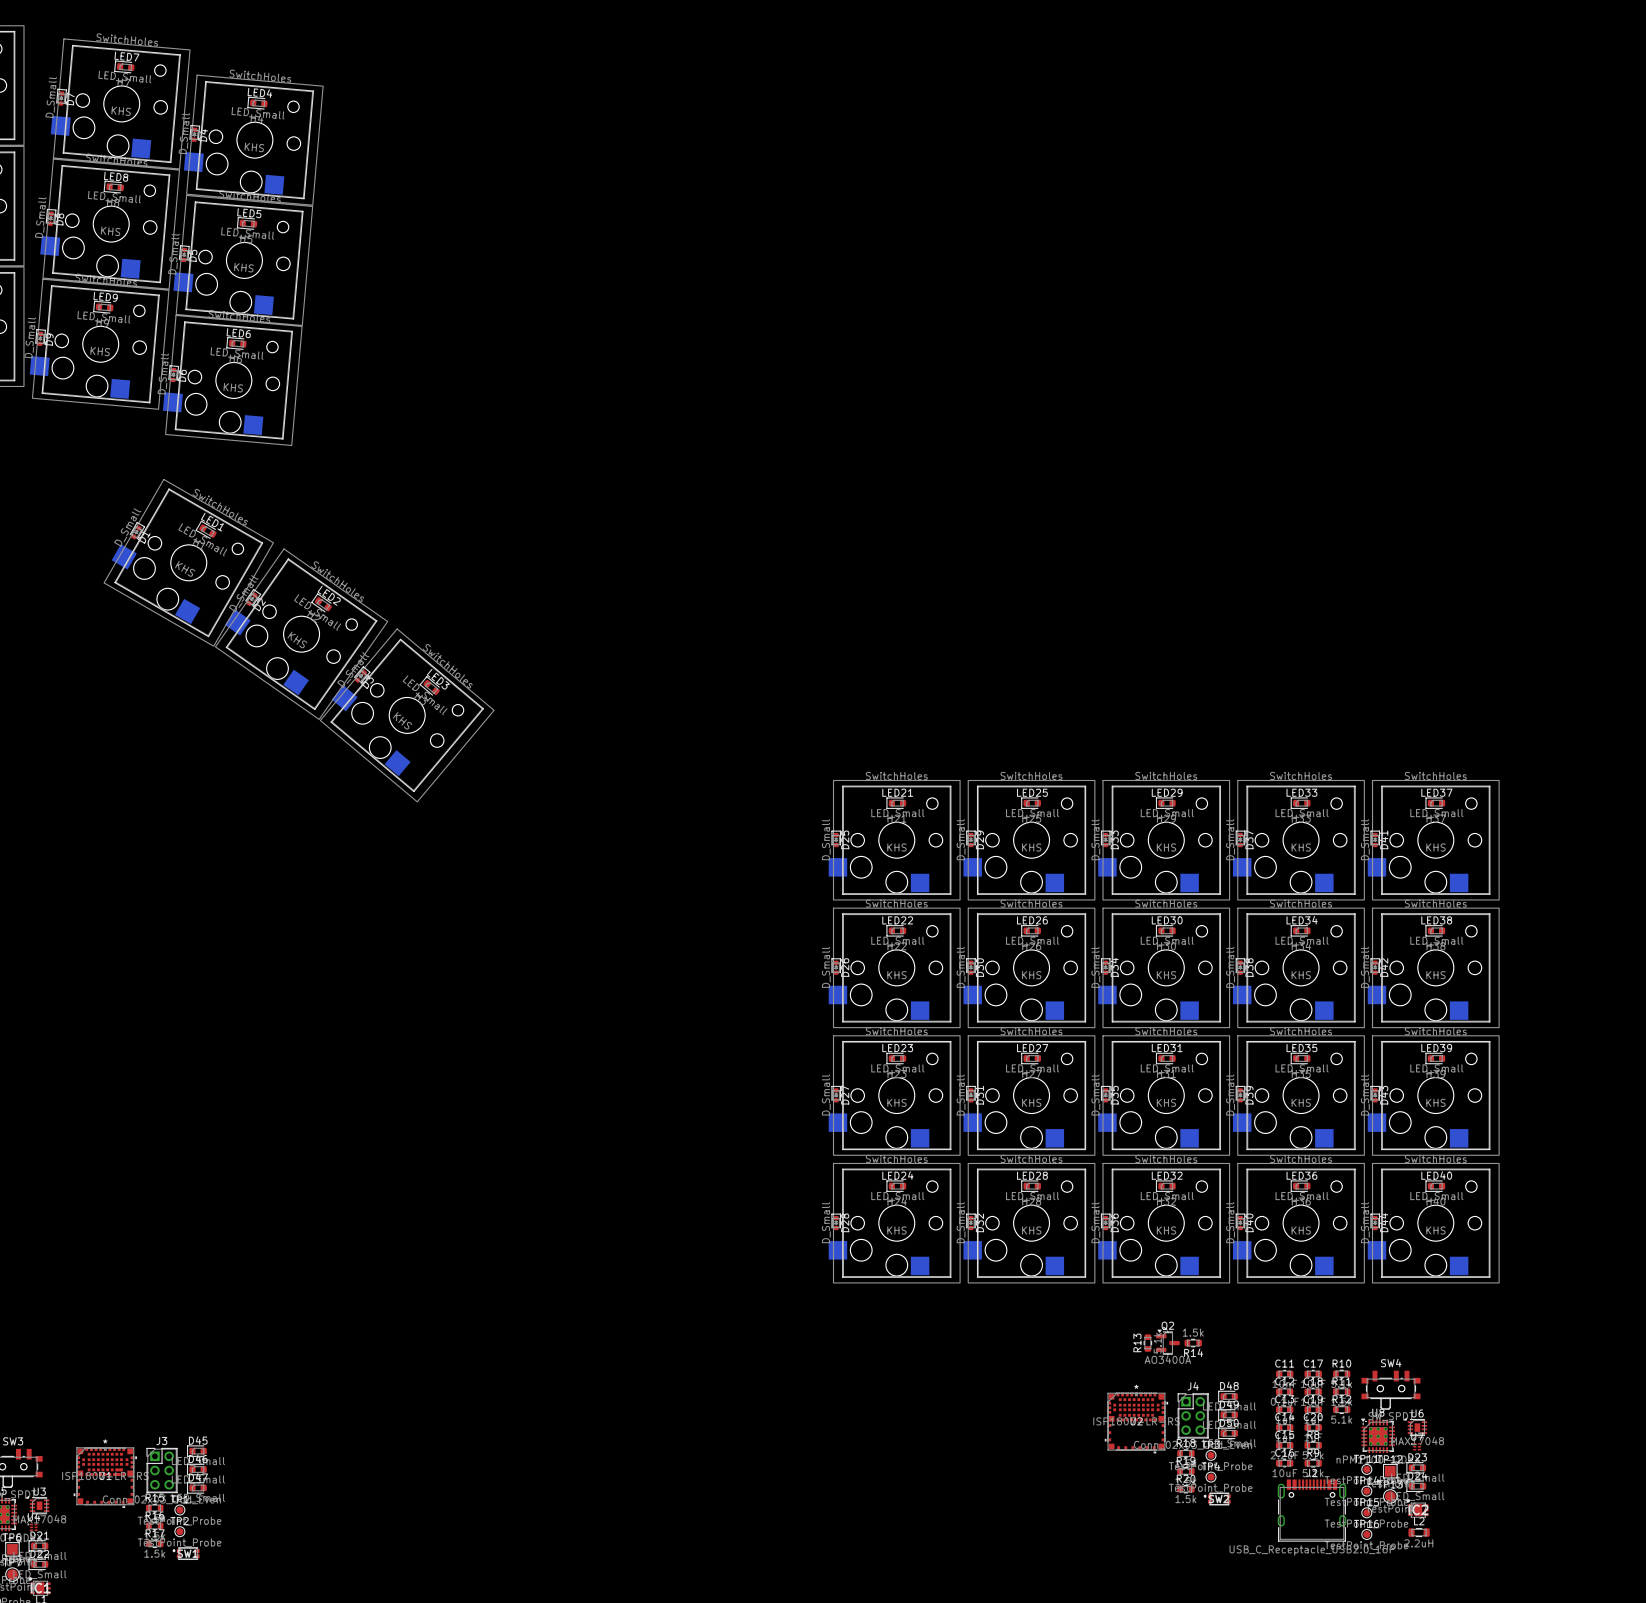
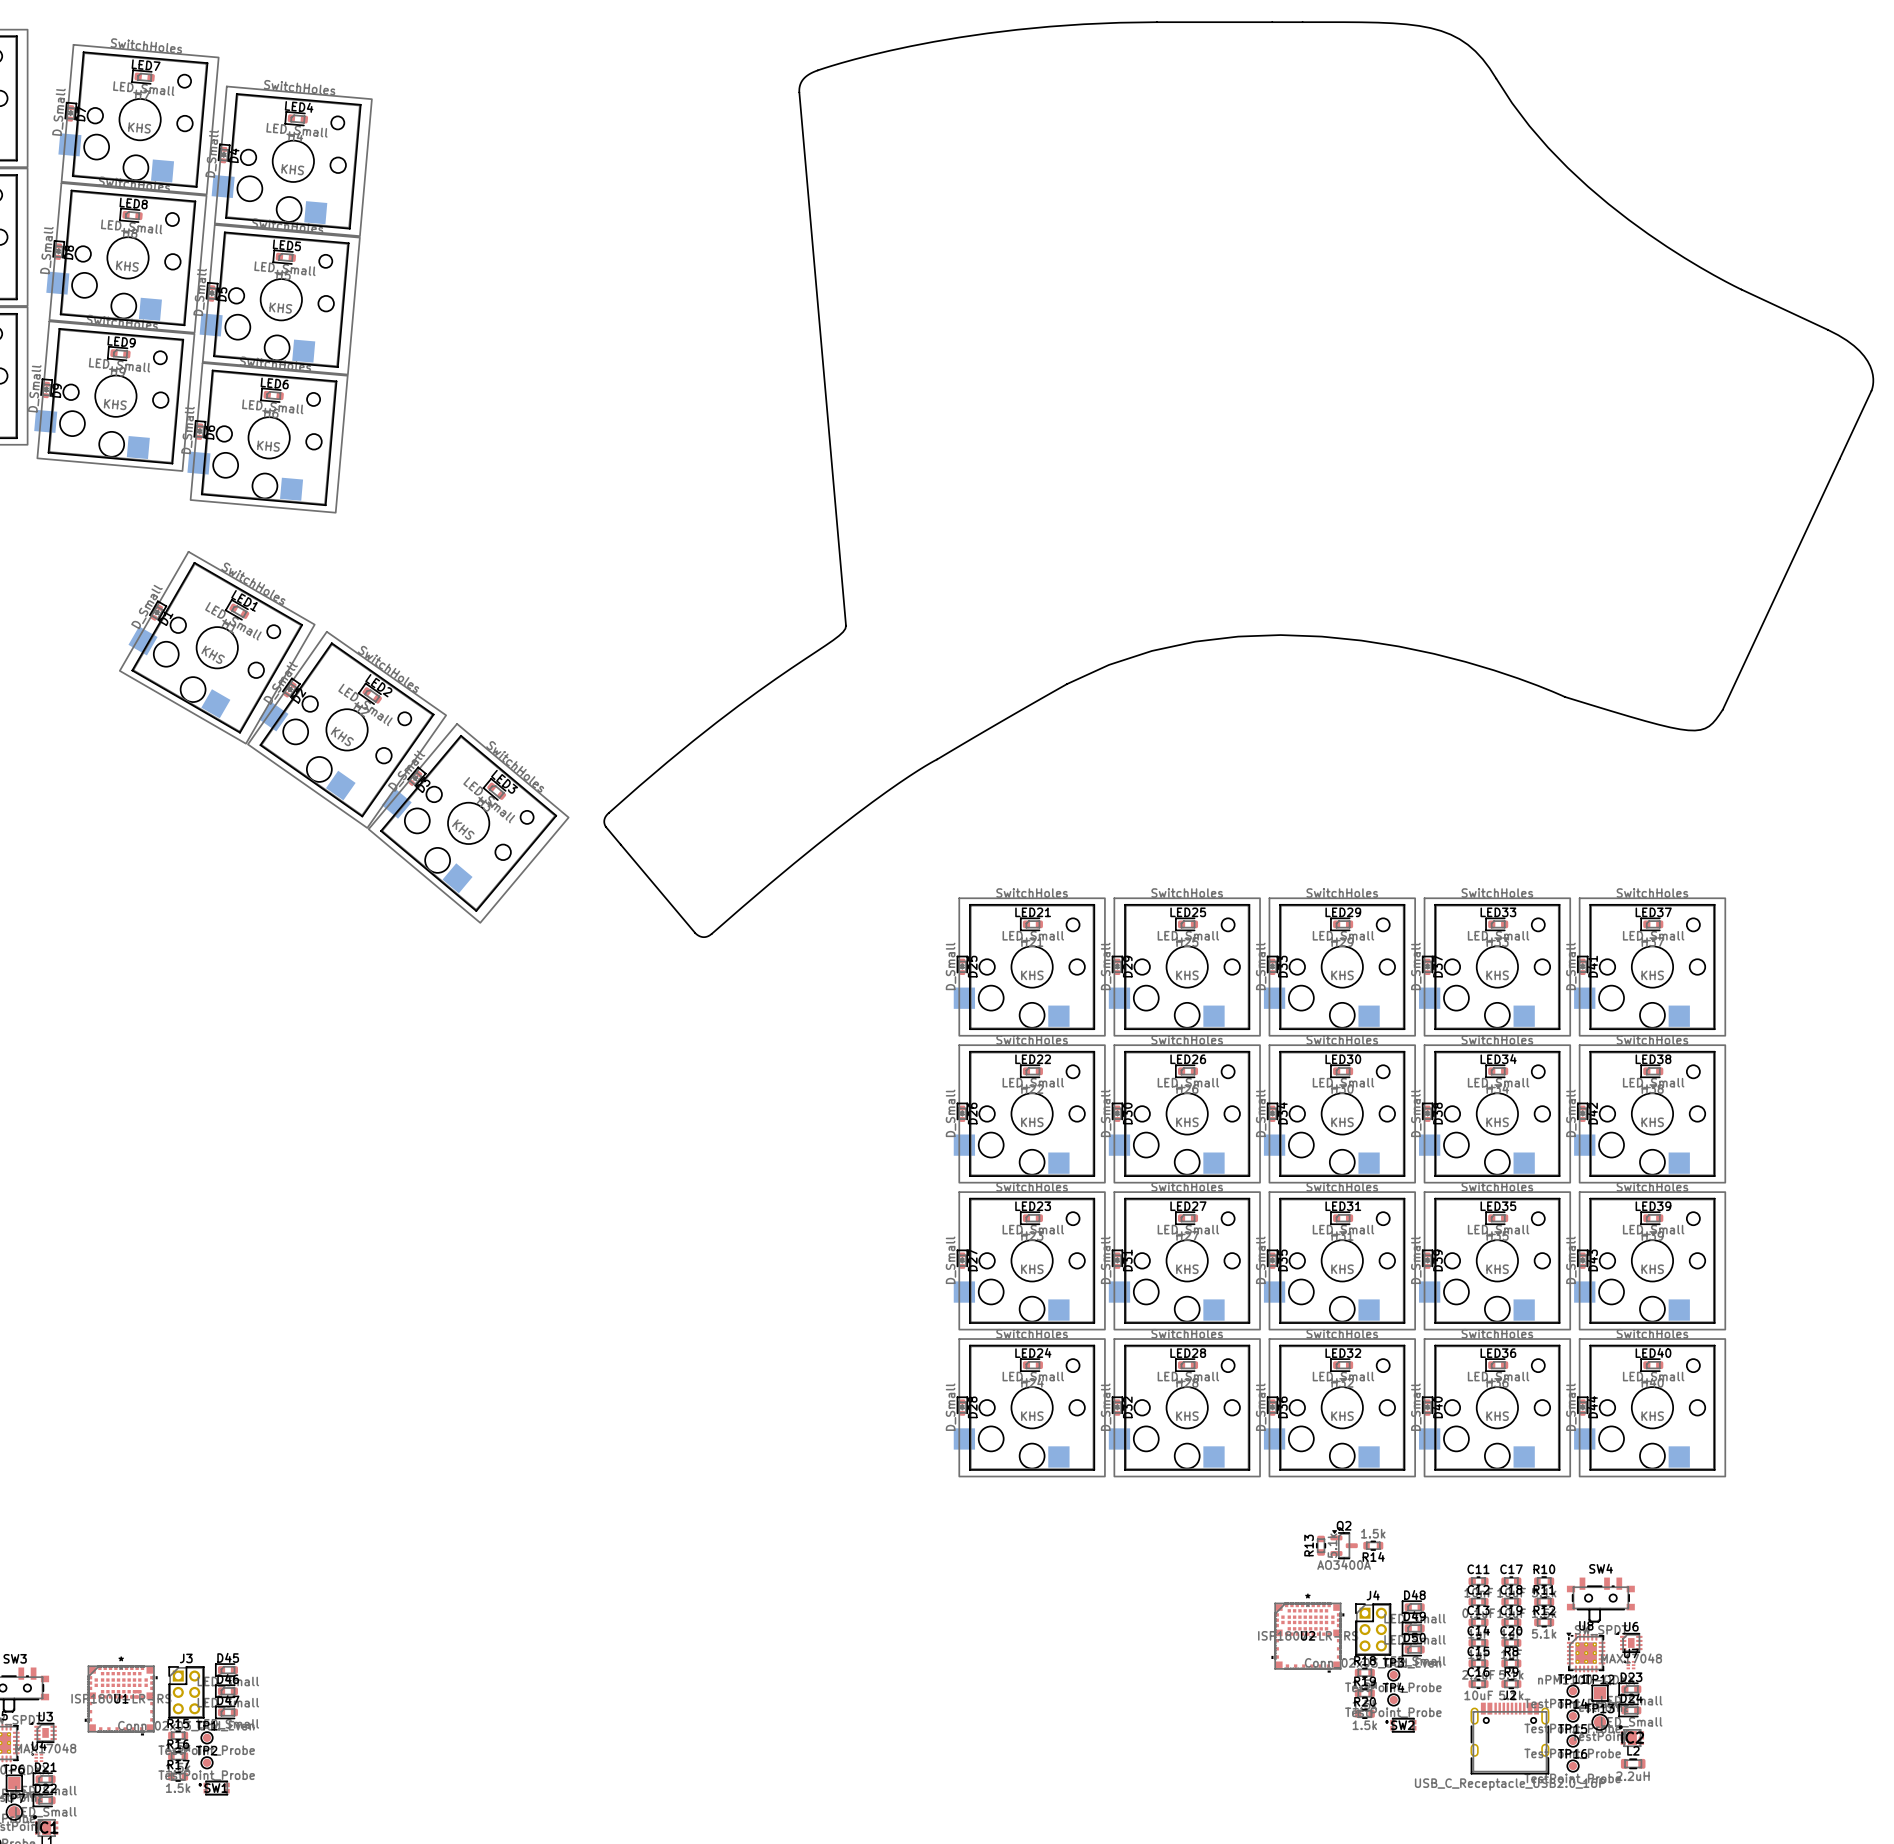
board edge: none -> (1156, 22) (1377, 22) (1419, 25) (1450, 34) (1467, 44) (1482, 59) (1512, 103) (1548, 147) (1588, 186) (1628, 219) (1700, 267) (1739, 288) (1838, 335) (1853, 345) (1864, 356) (1872, 374) (1871, 390) (1722, 709) (1712, 723) (1705, 728) (1694, 730) (1680, 729) (1564, 696) (1518, 678) (1465, 661) (1398, 646) (1361, 640) (1280, 635) (1238, 636) (1195, 641) (1152, 650) (1109, 664) (1067, 684) (918, 770) (837, 828) (710, 935) (703, 937) (698, 935) (606, 827) (604, 818) (693, 740) (758, 691) (833, 640) (843, 632) (846, 625) (799, 92) (801, 81) (813, 72) (841, 62) (889, 50) (959, 37) (1049, 26) (1156, 22)

